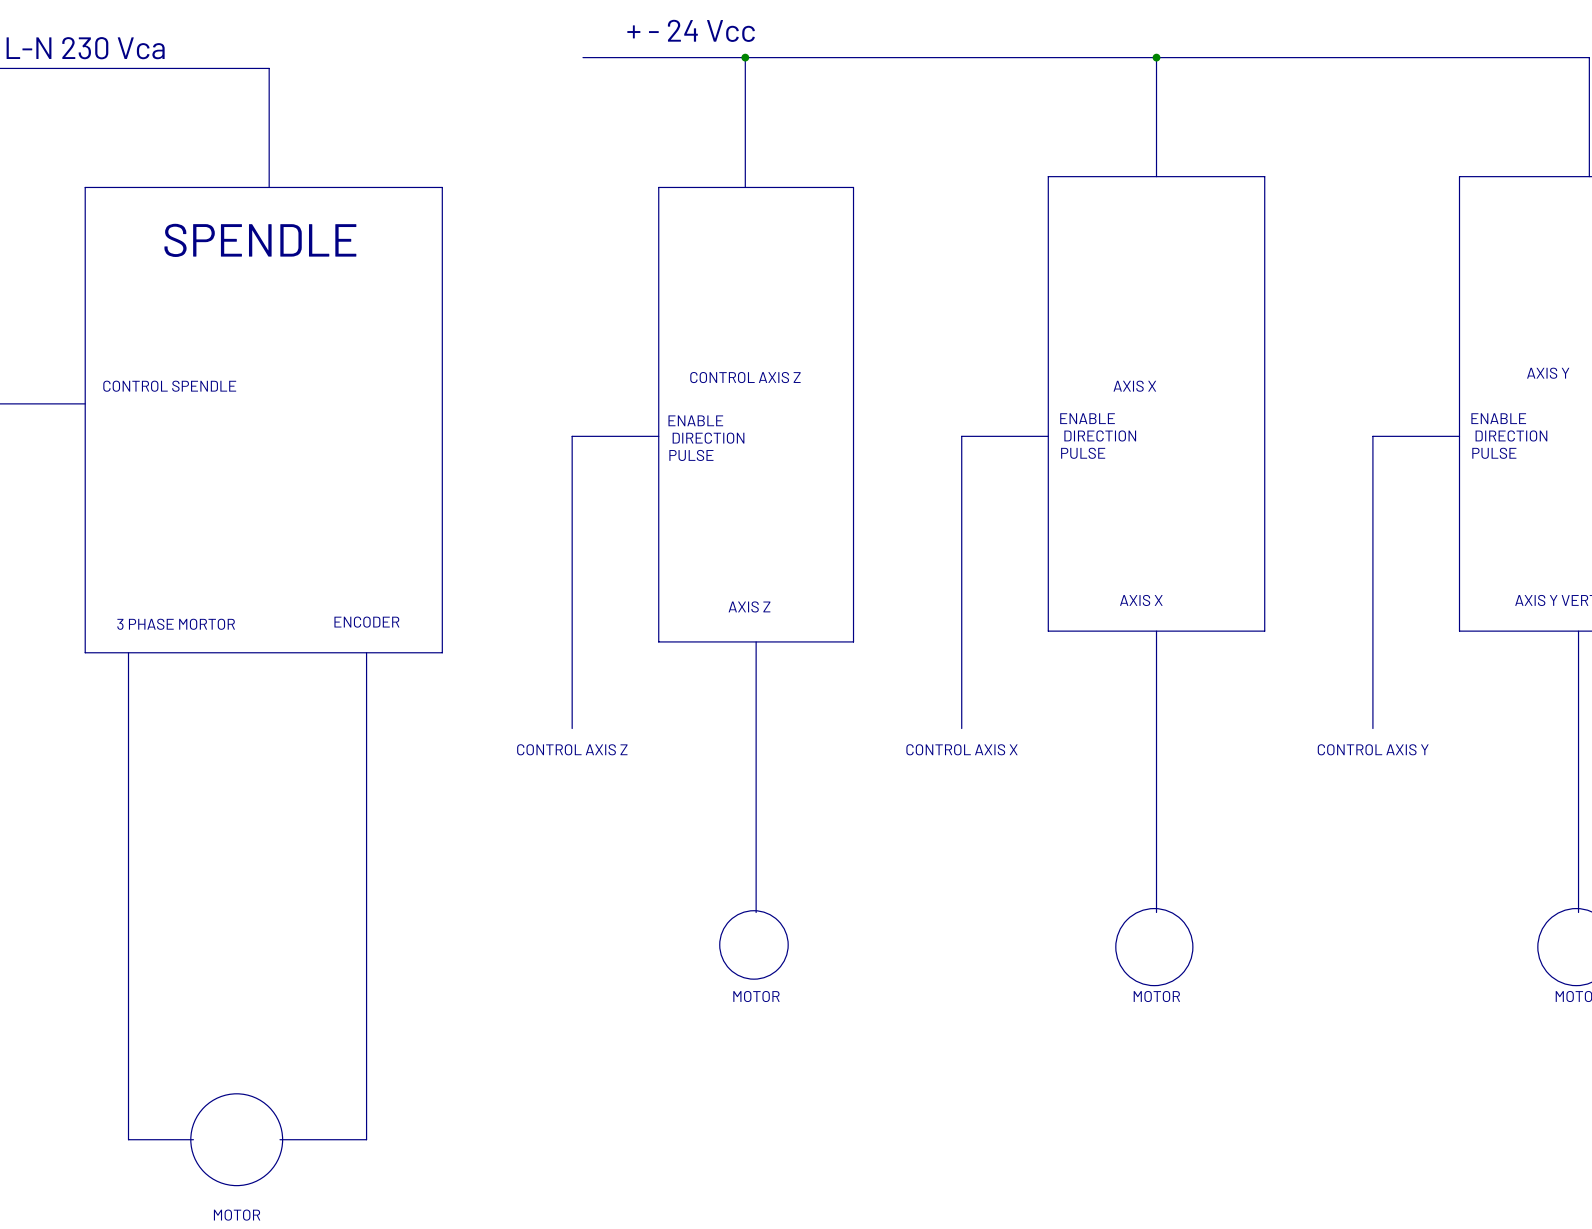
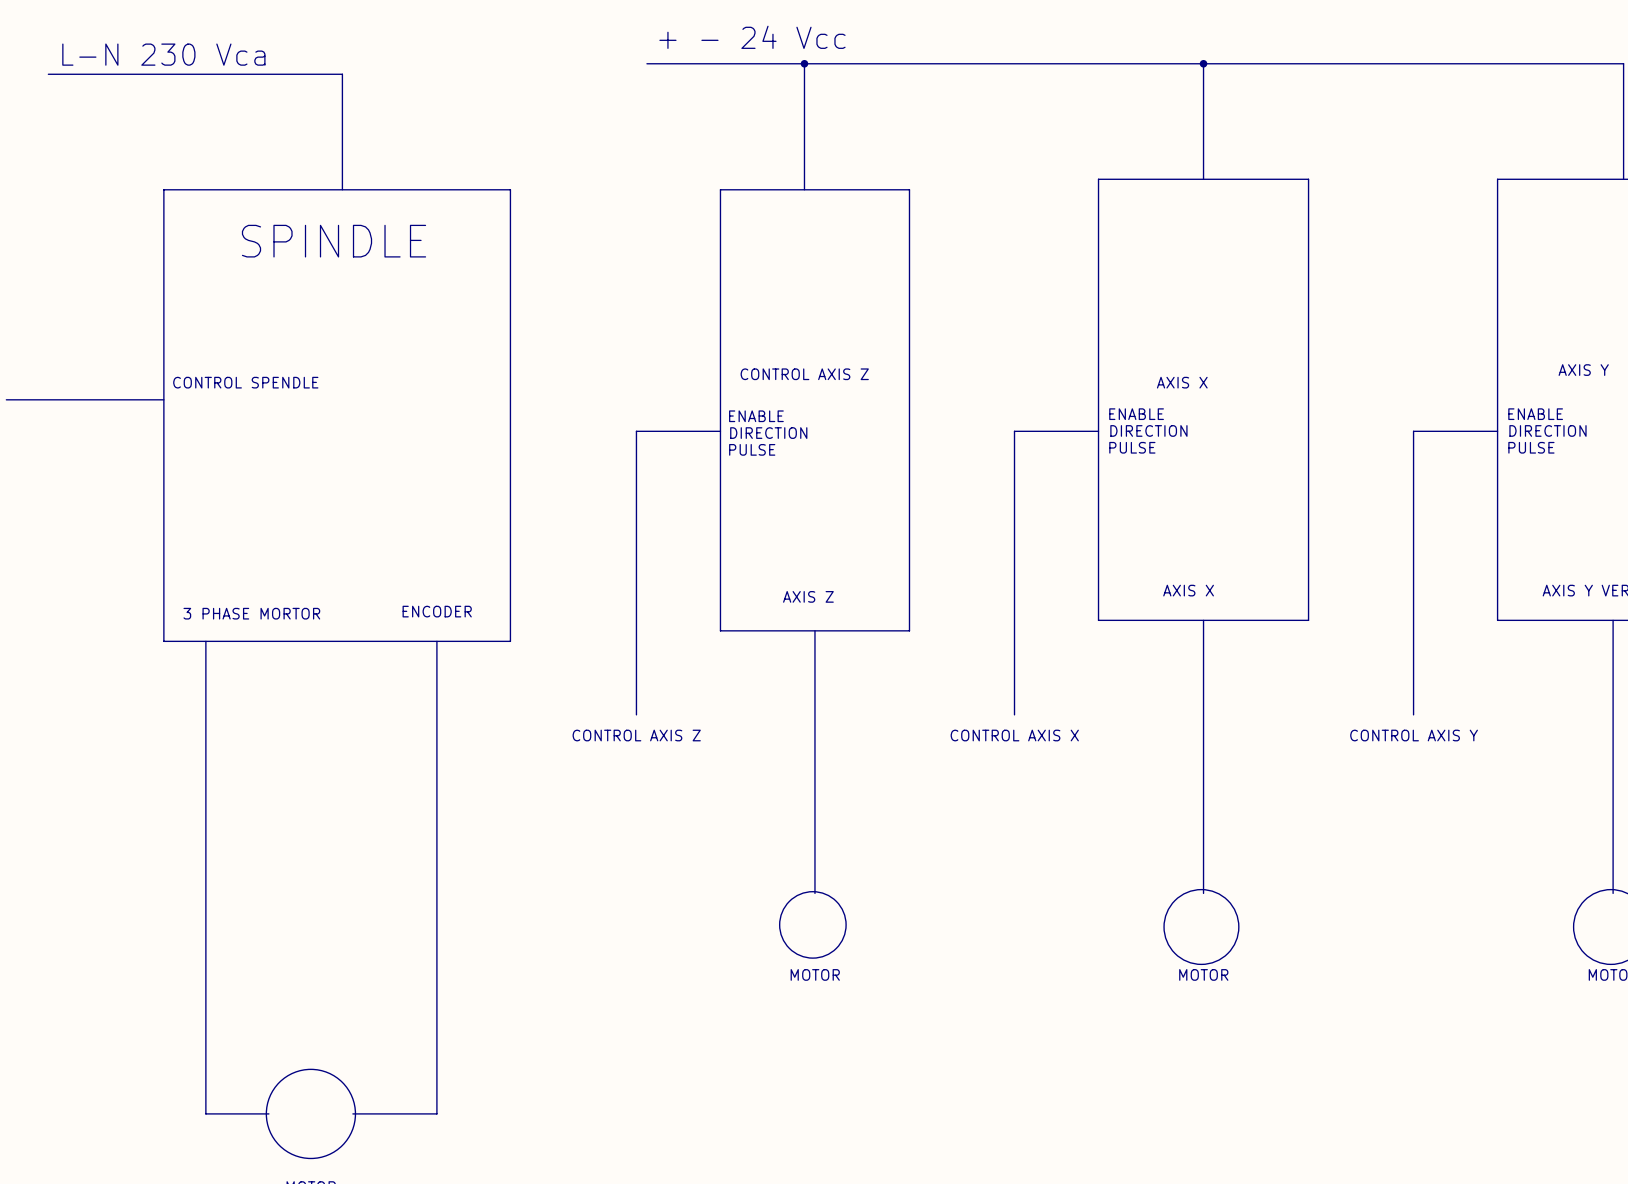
text: SPENDLE (260, 240) -> SPINDLE (334, 241)

